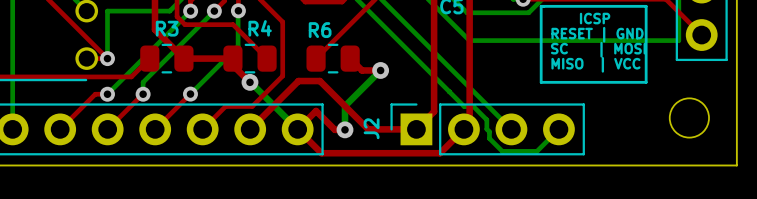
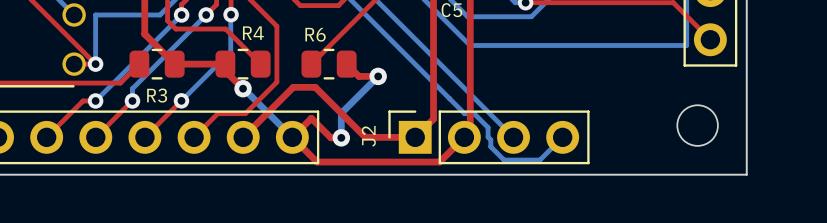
line: (541, 6) (646, 6) (646, 82) (541, 82) (541, 6) -> none
text: ICSP (595, 18) -> none
R3 name position: R3 (167, 28) -> R3 (157, 95)
text: RESET | GND (597, 34) -> none
text: SC | MOSI (598, 49) -> none
text: MISO | VCC (595, 64) -> none

